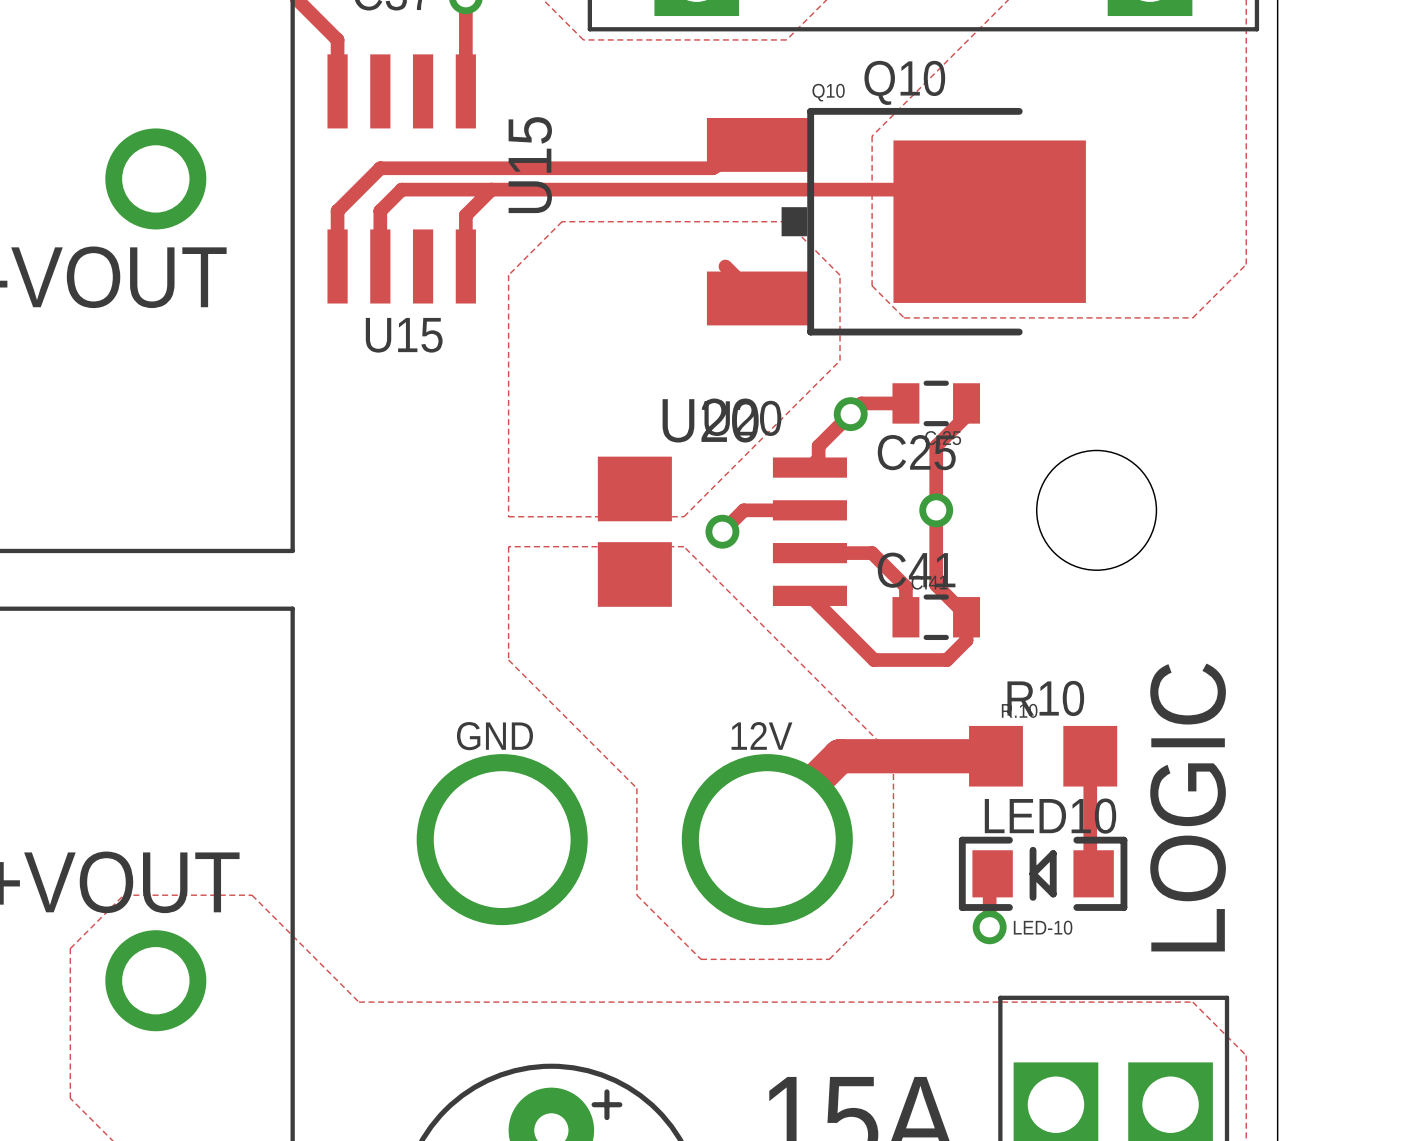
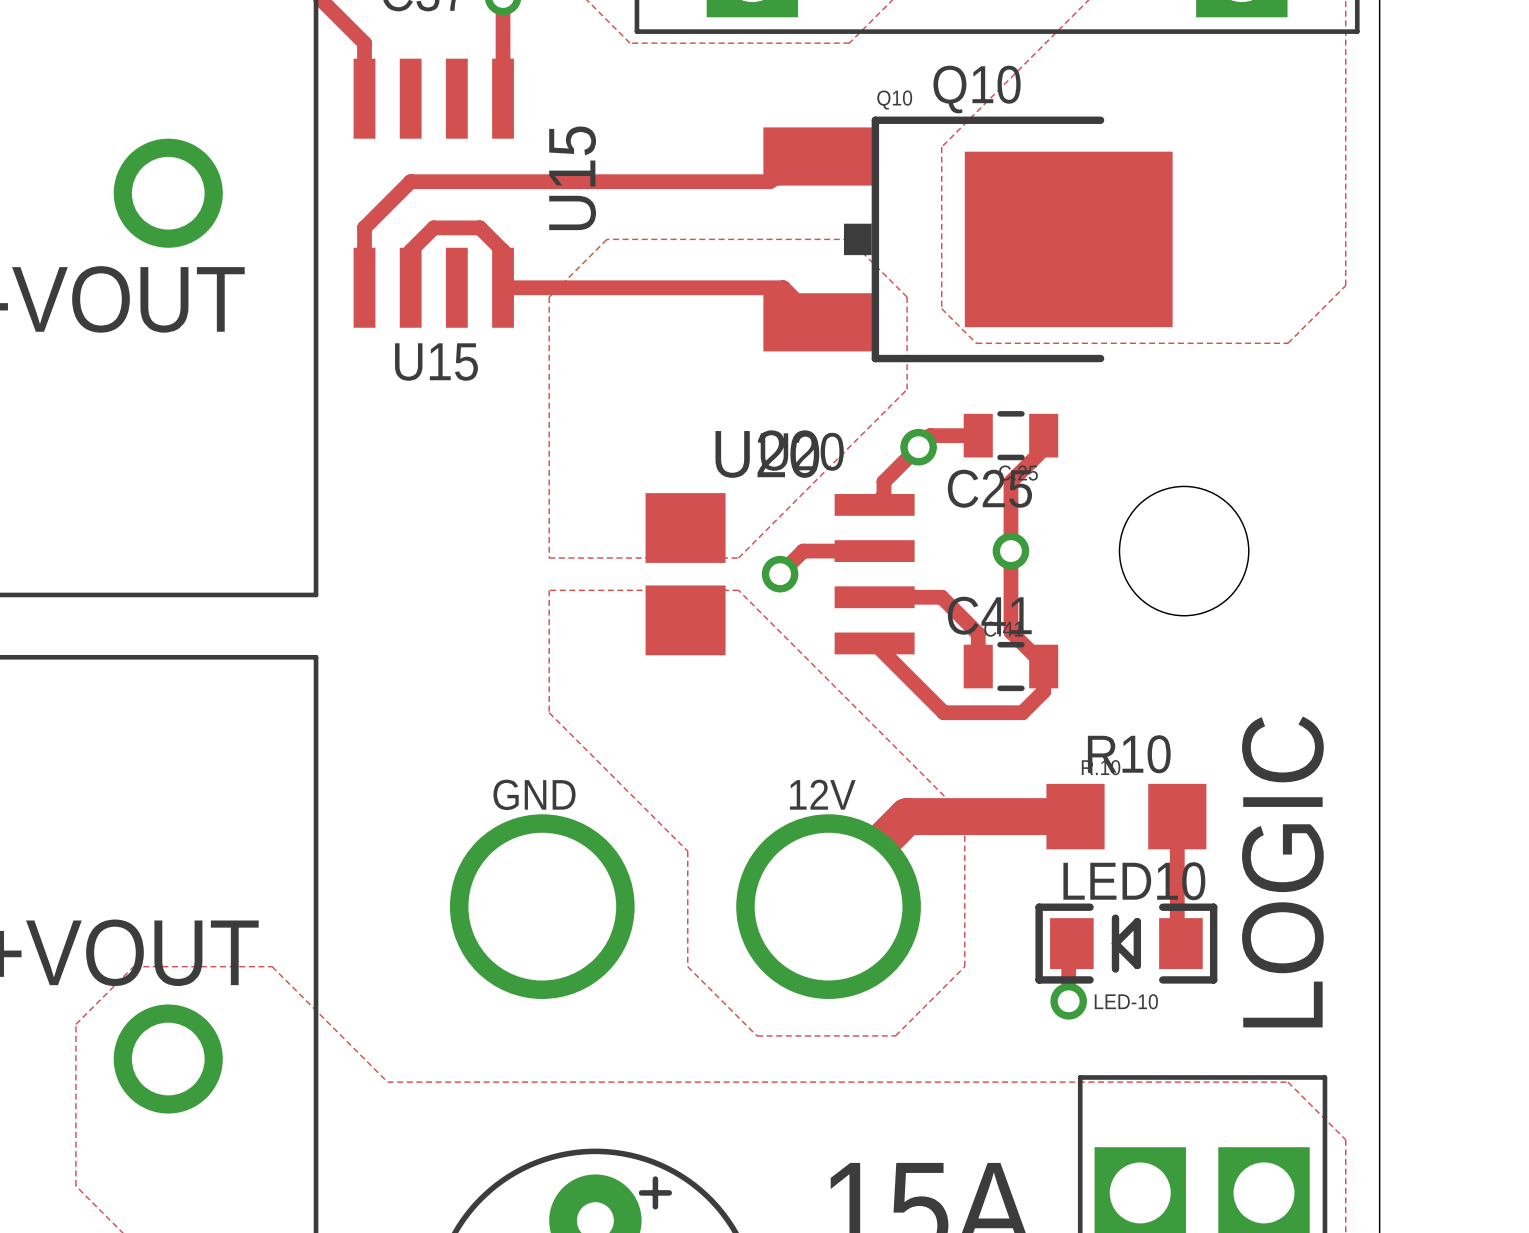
track: (491, 189) (465, 215) (465, 232) -> (410, 250) (433, 227) (479, 227) (503, 250)
track: (989, 221) (957, 189) (401, 189) (380, 211) (380, 232) -> none
track: none -> (503, 287) (783, 287)

